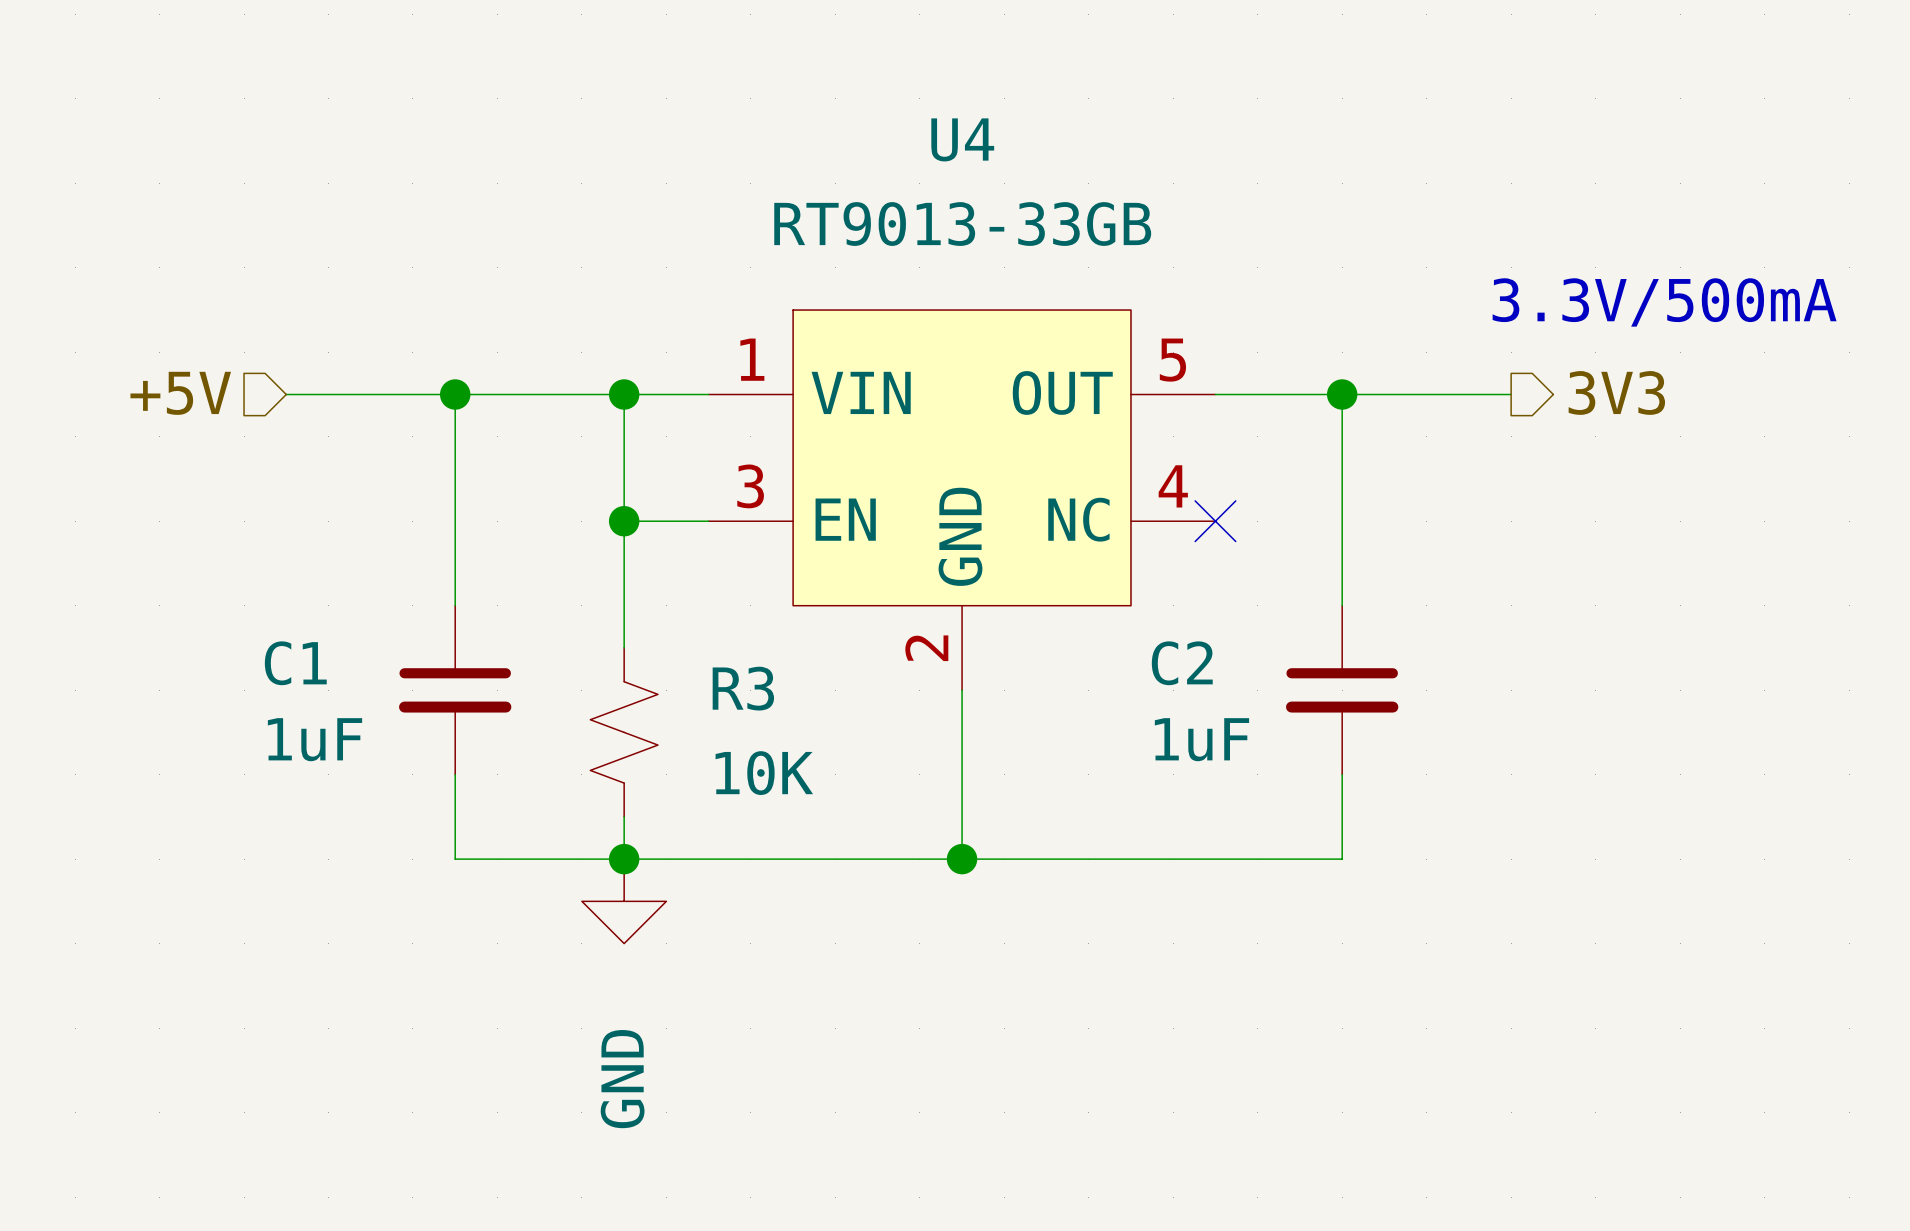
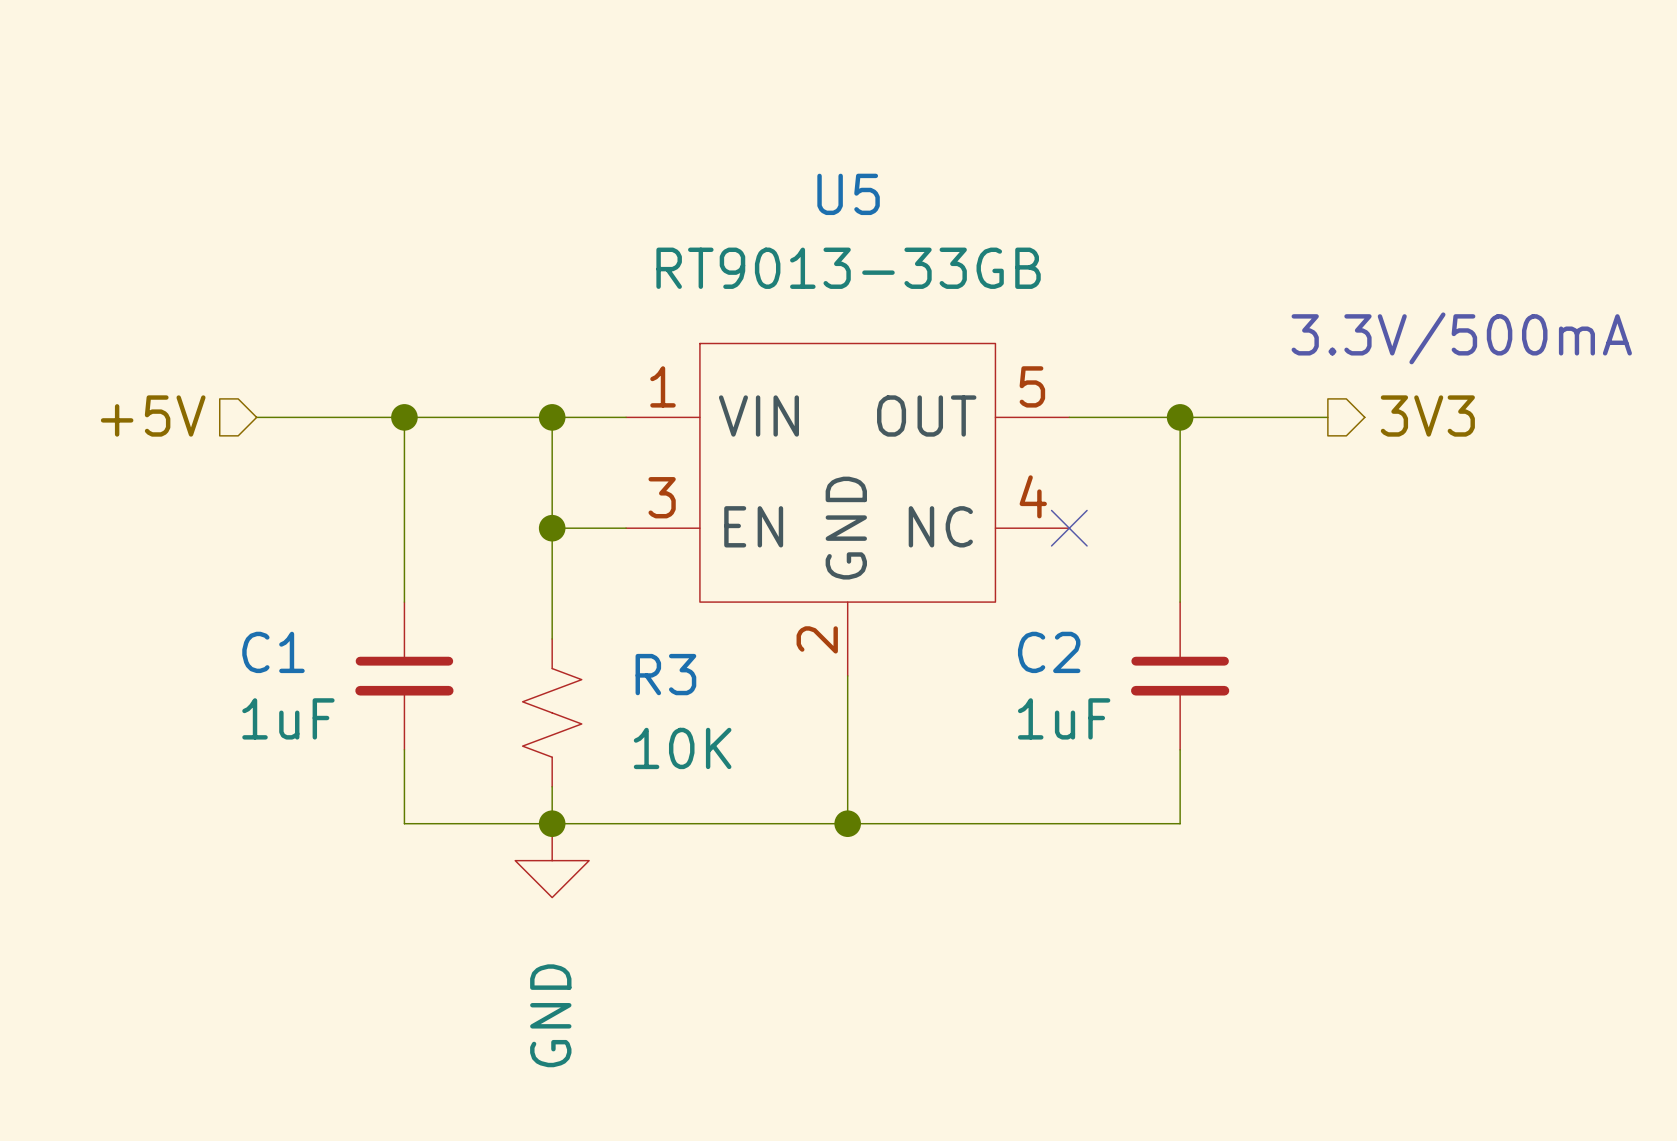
U4: RT9013-33GB (962, 500) -> none
U5: none -> RT9013-33GB (847, 509)

